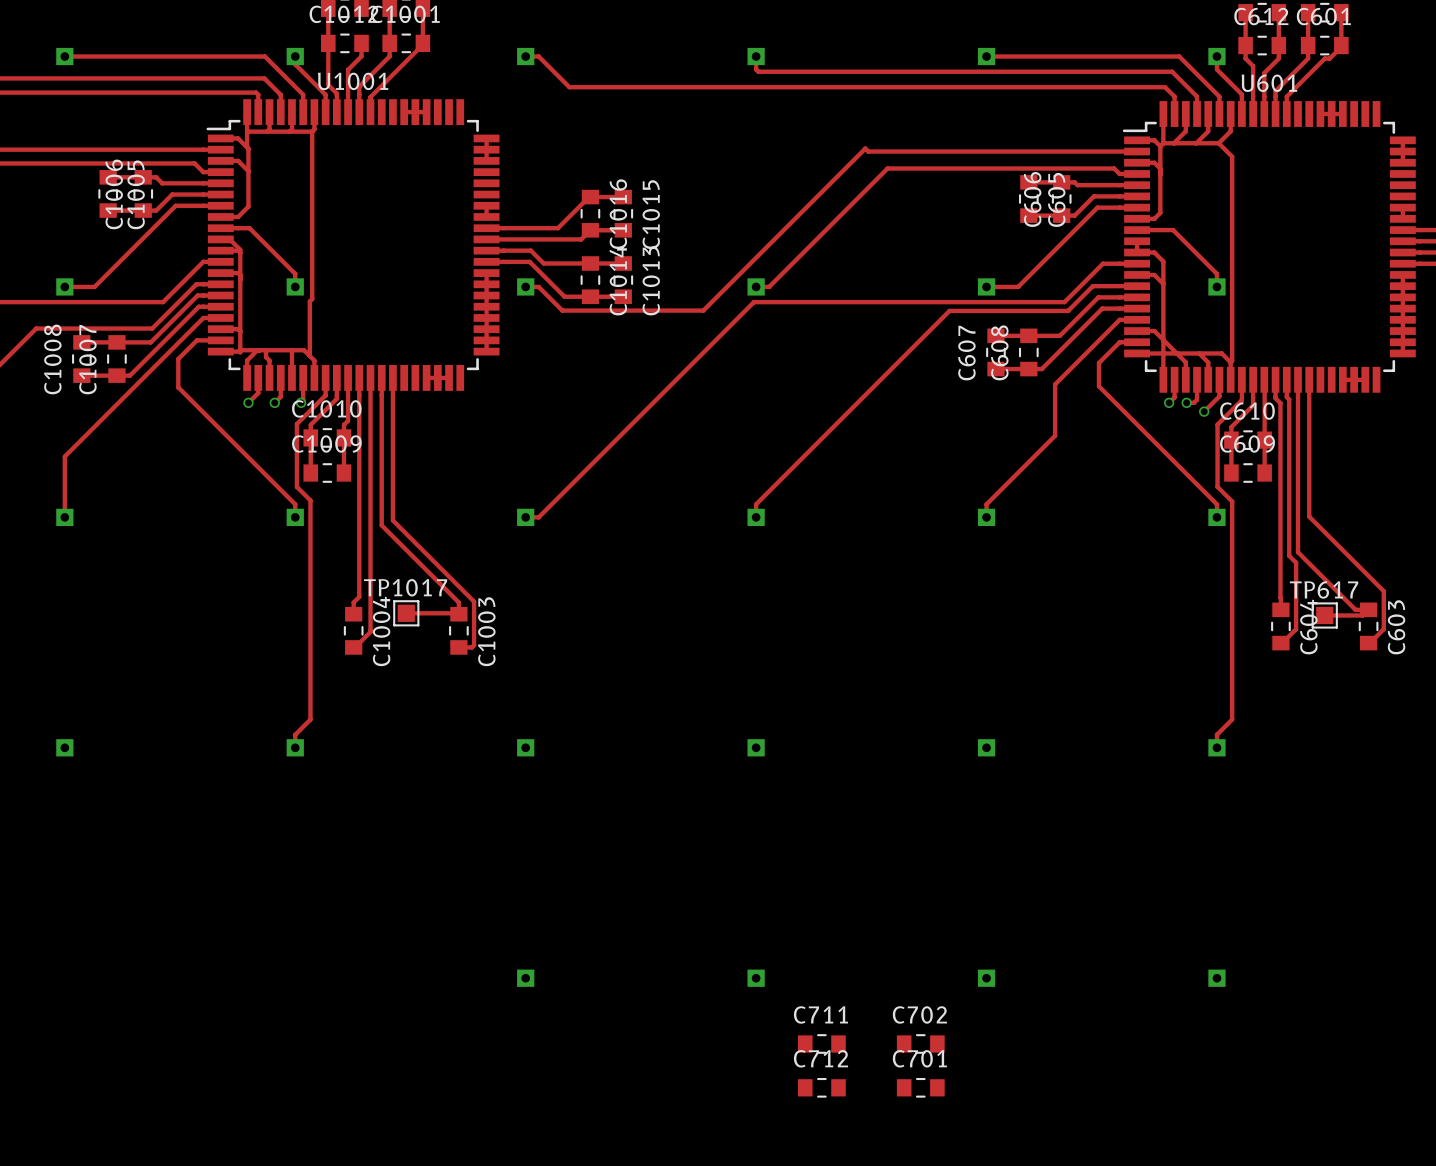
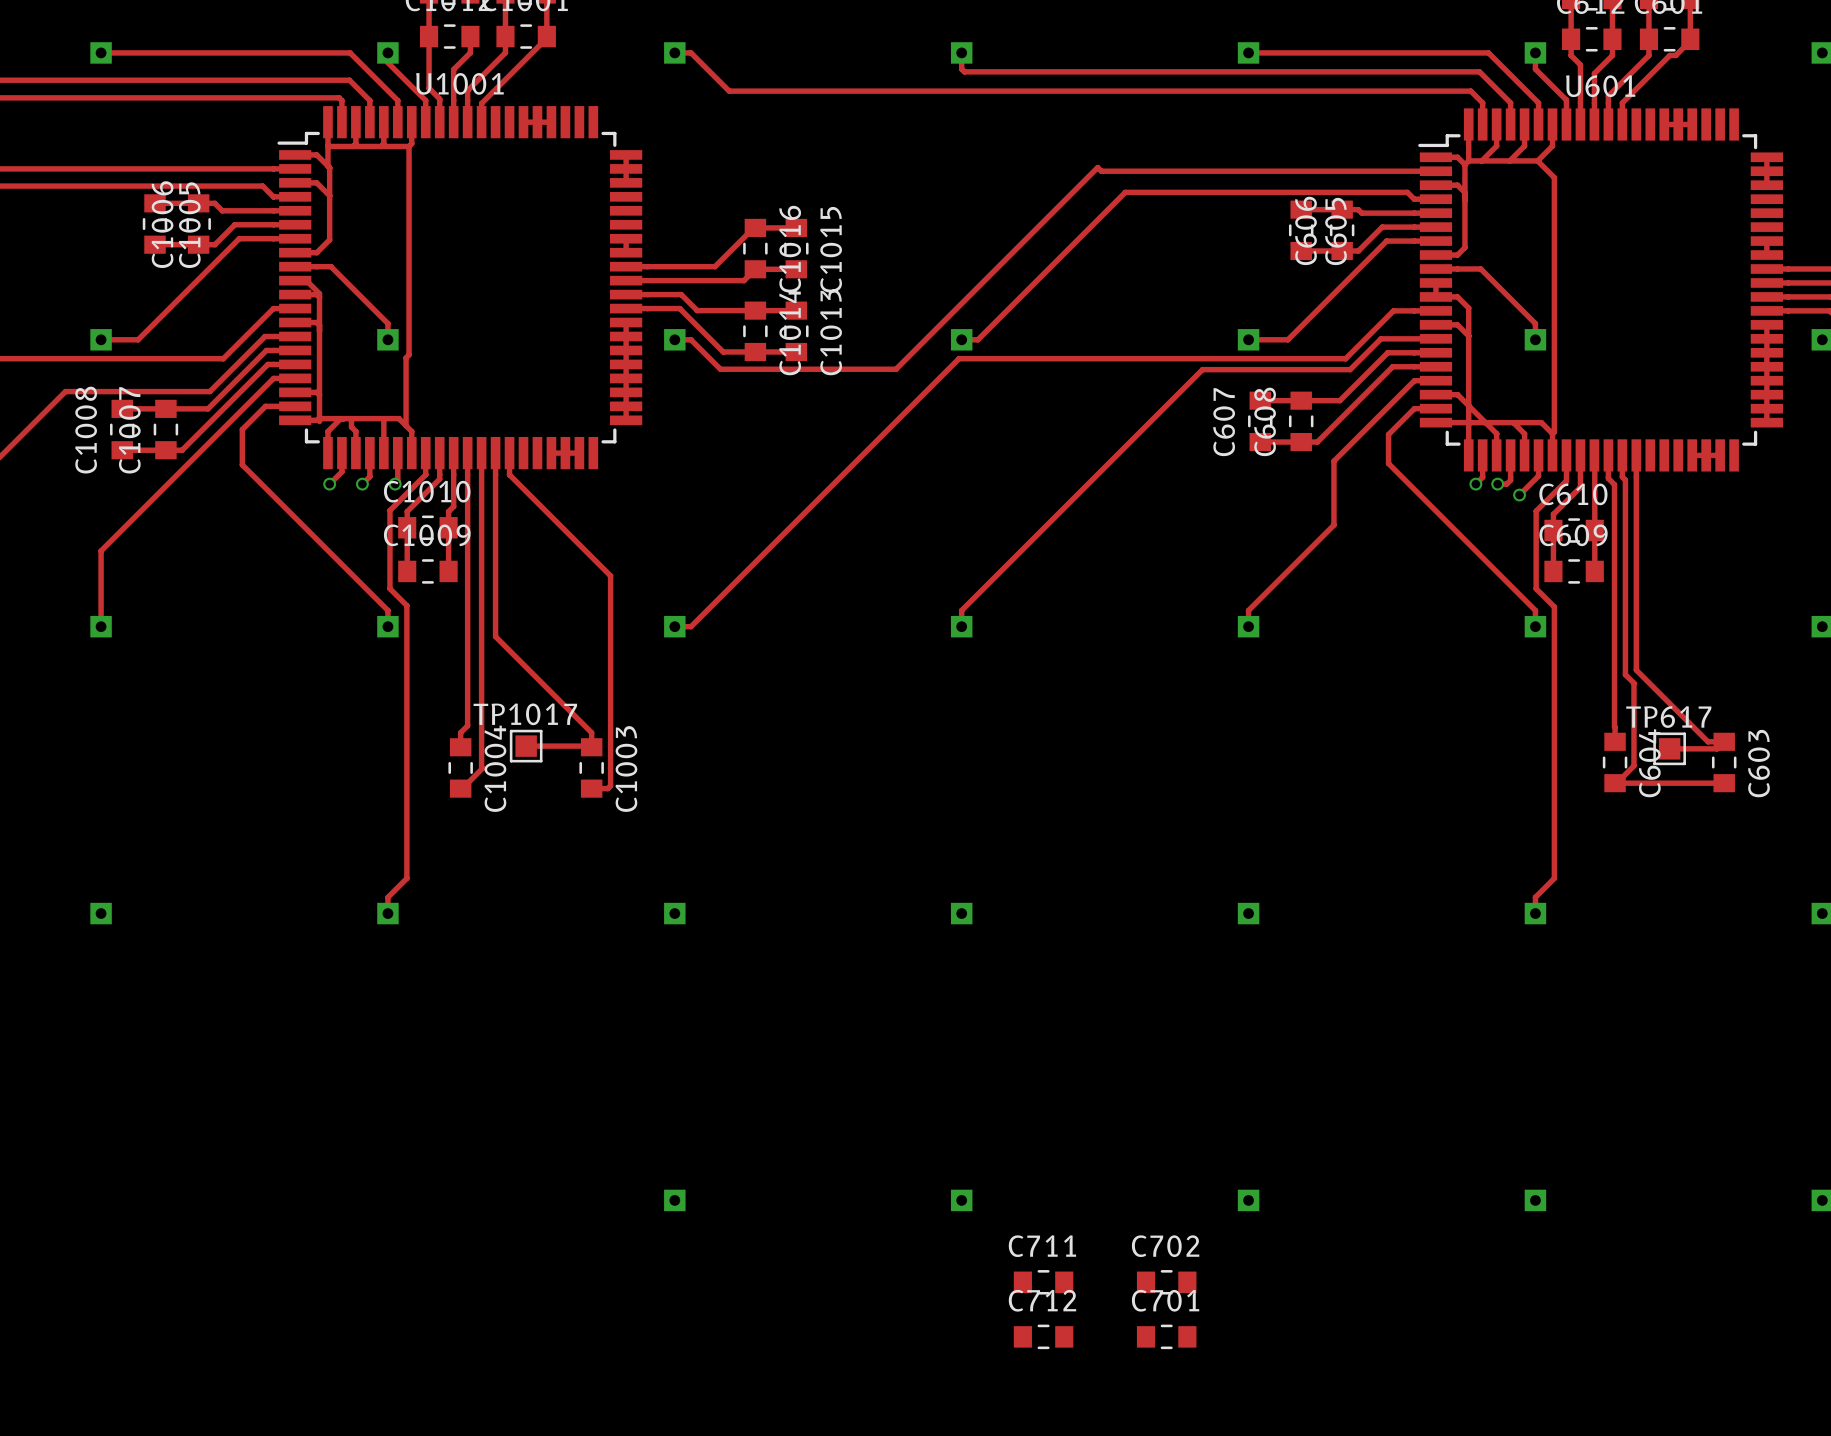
track: (1309, 379) (1309, 516) (1383, 591) (1383, 629) (1368, 643) -> (1616, 783) (1724, 783)
track: (392, 395) (392, 520) (474, 601) -> (509, 474) (610, 575) (610, 731)

